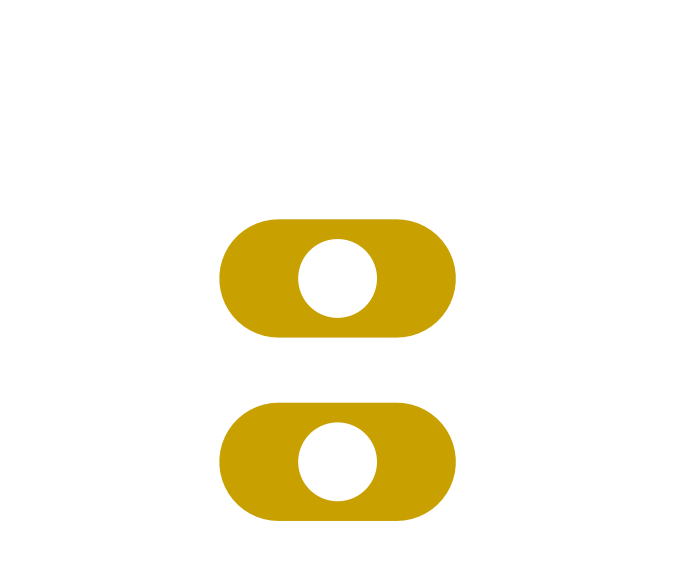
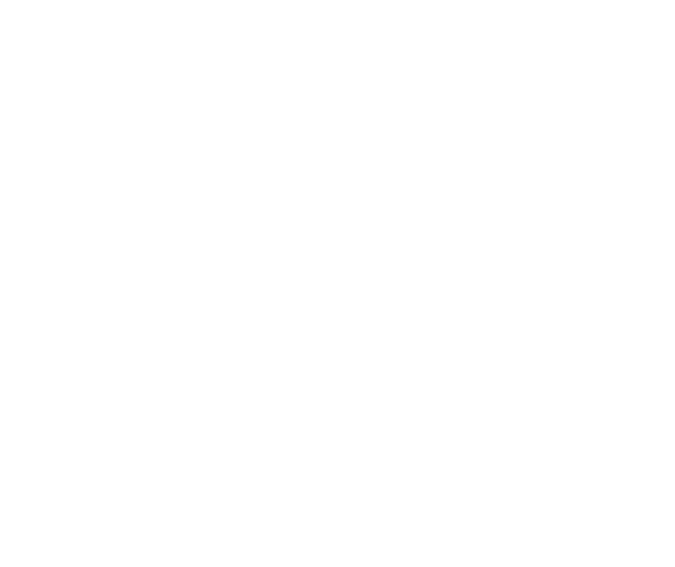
part: (337, 370) -> none

